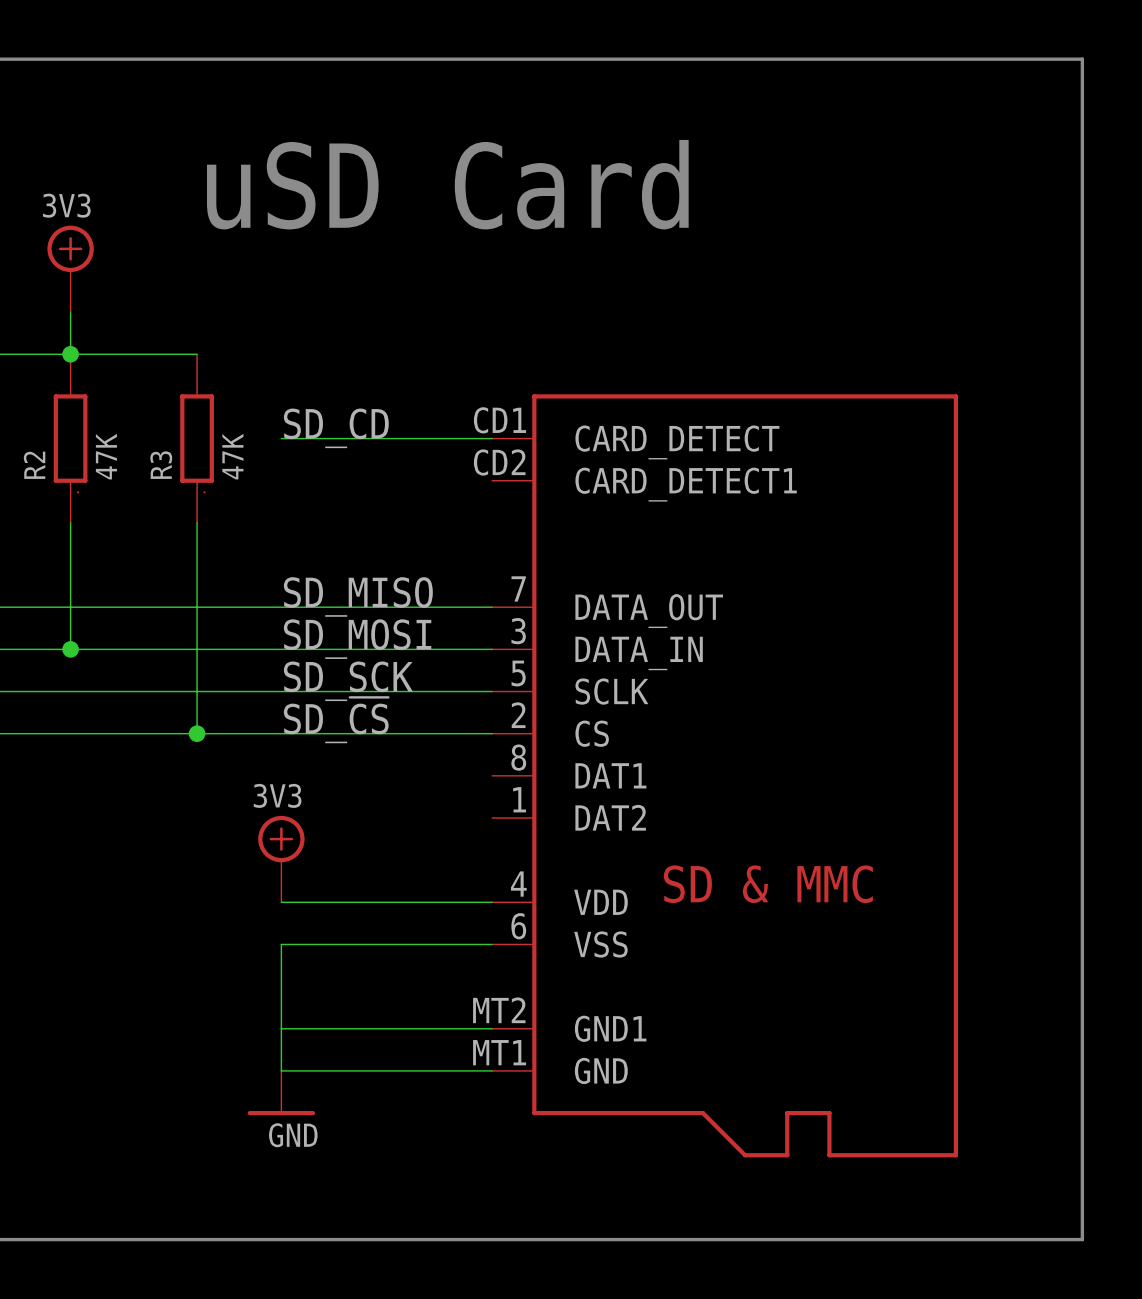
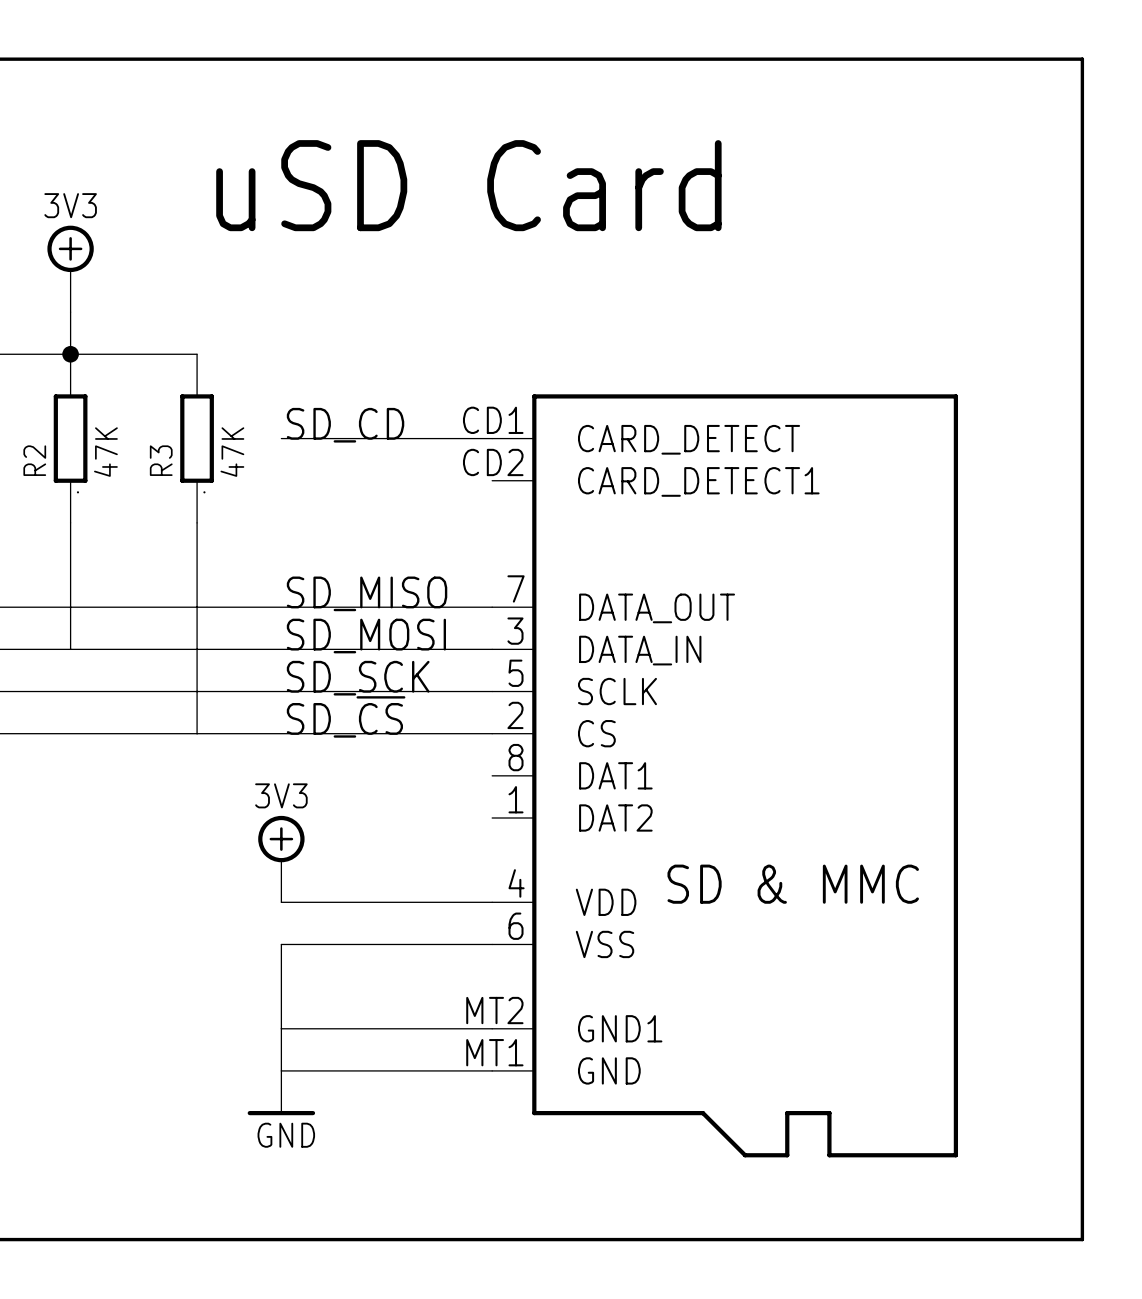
junction: (70, 649) -> none
junction: (197, 733) -> none

